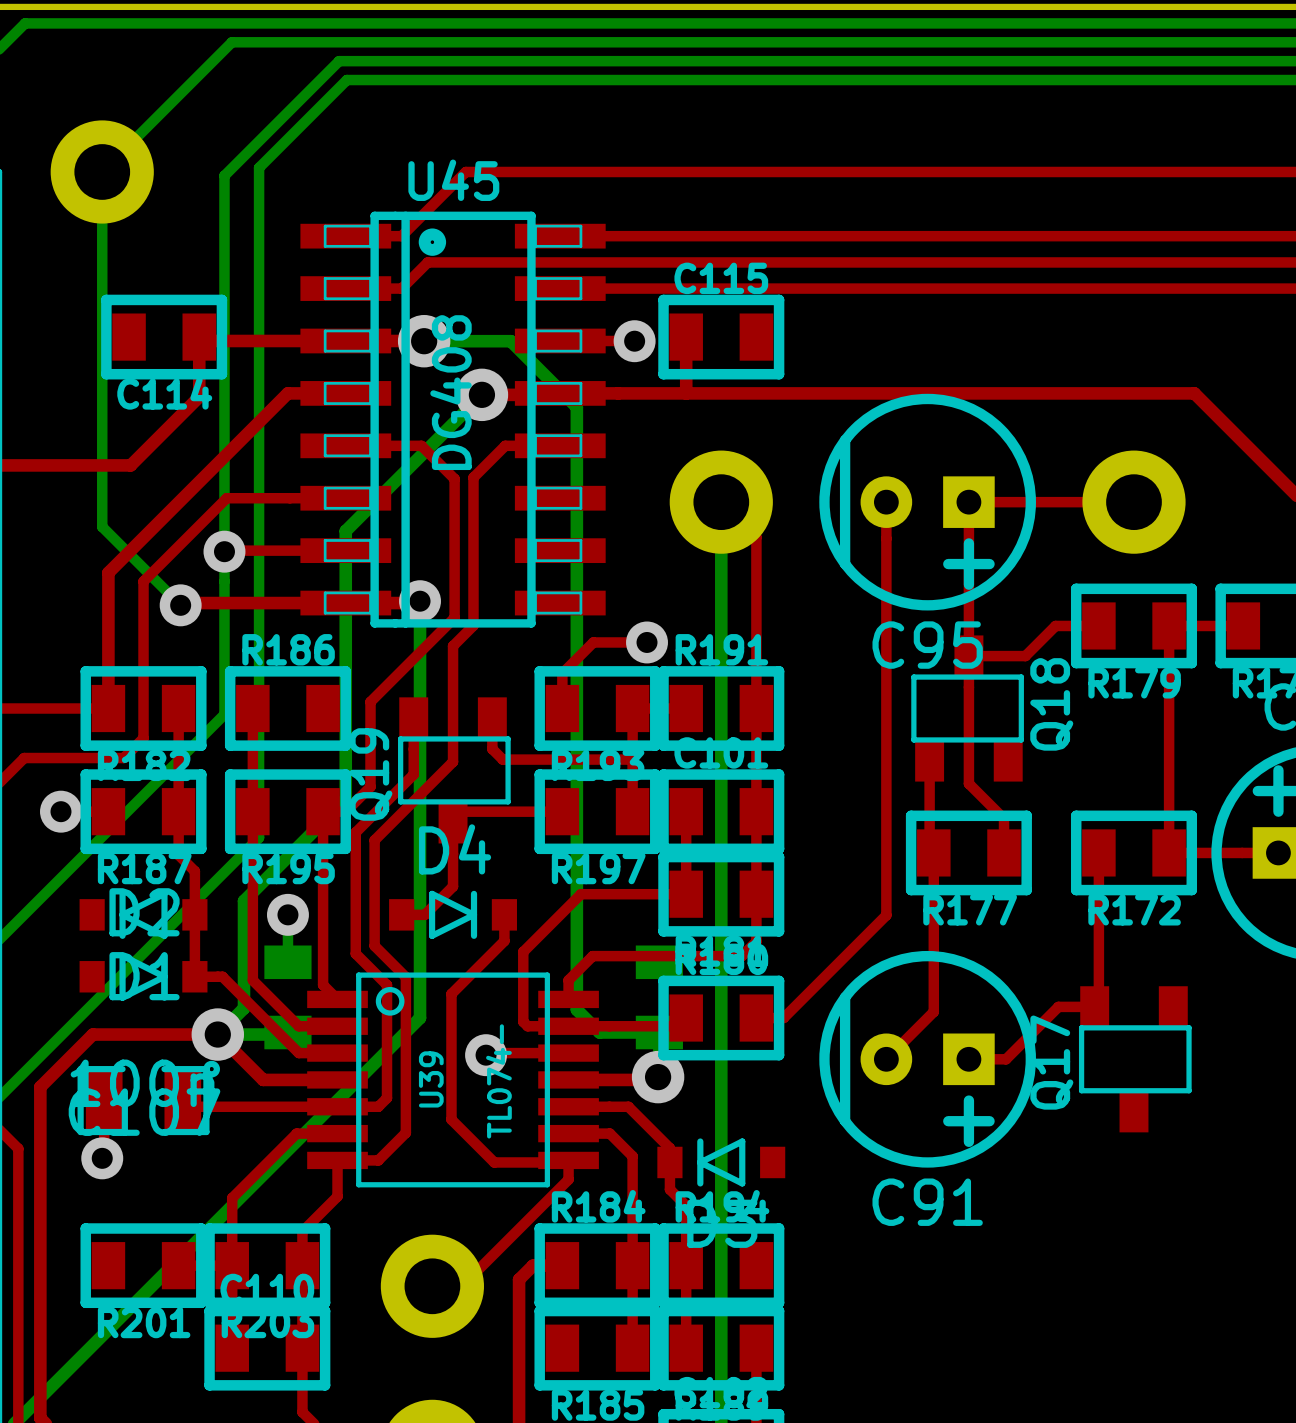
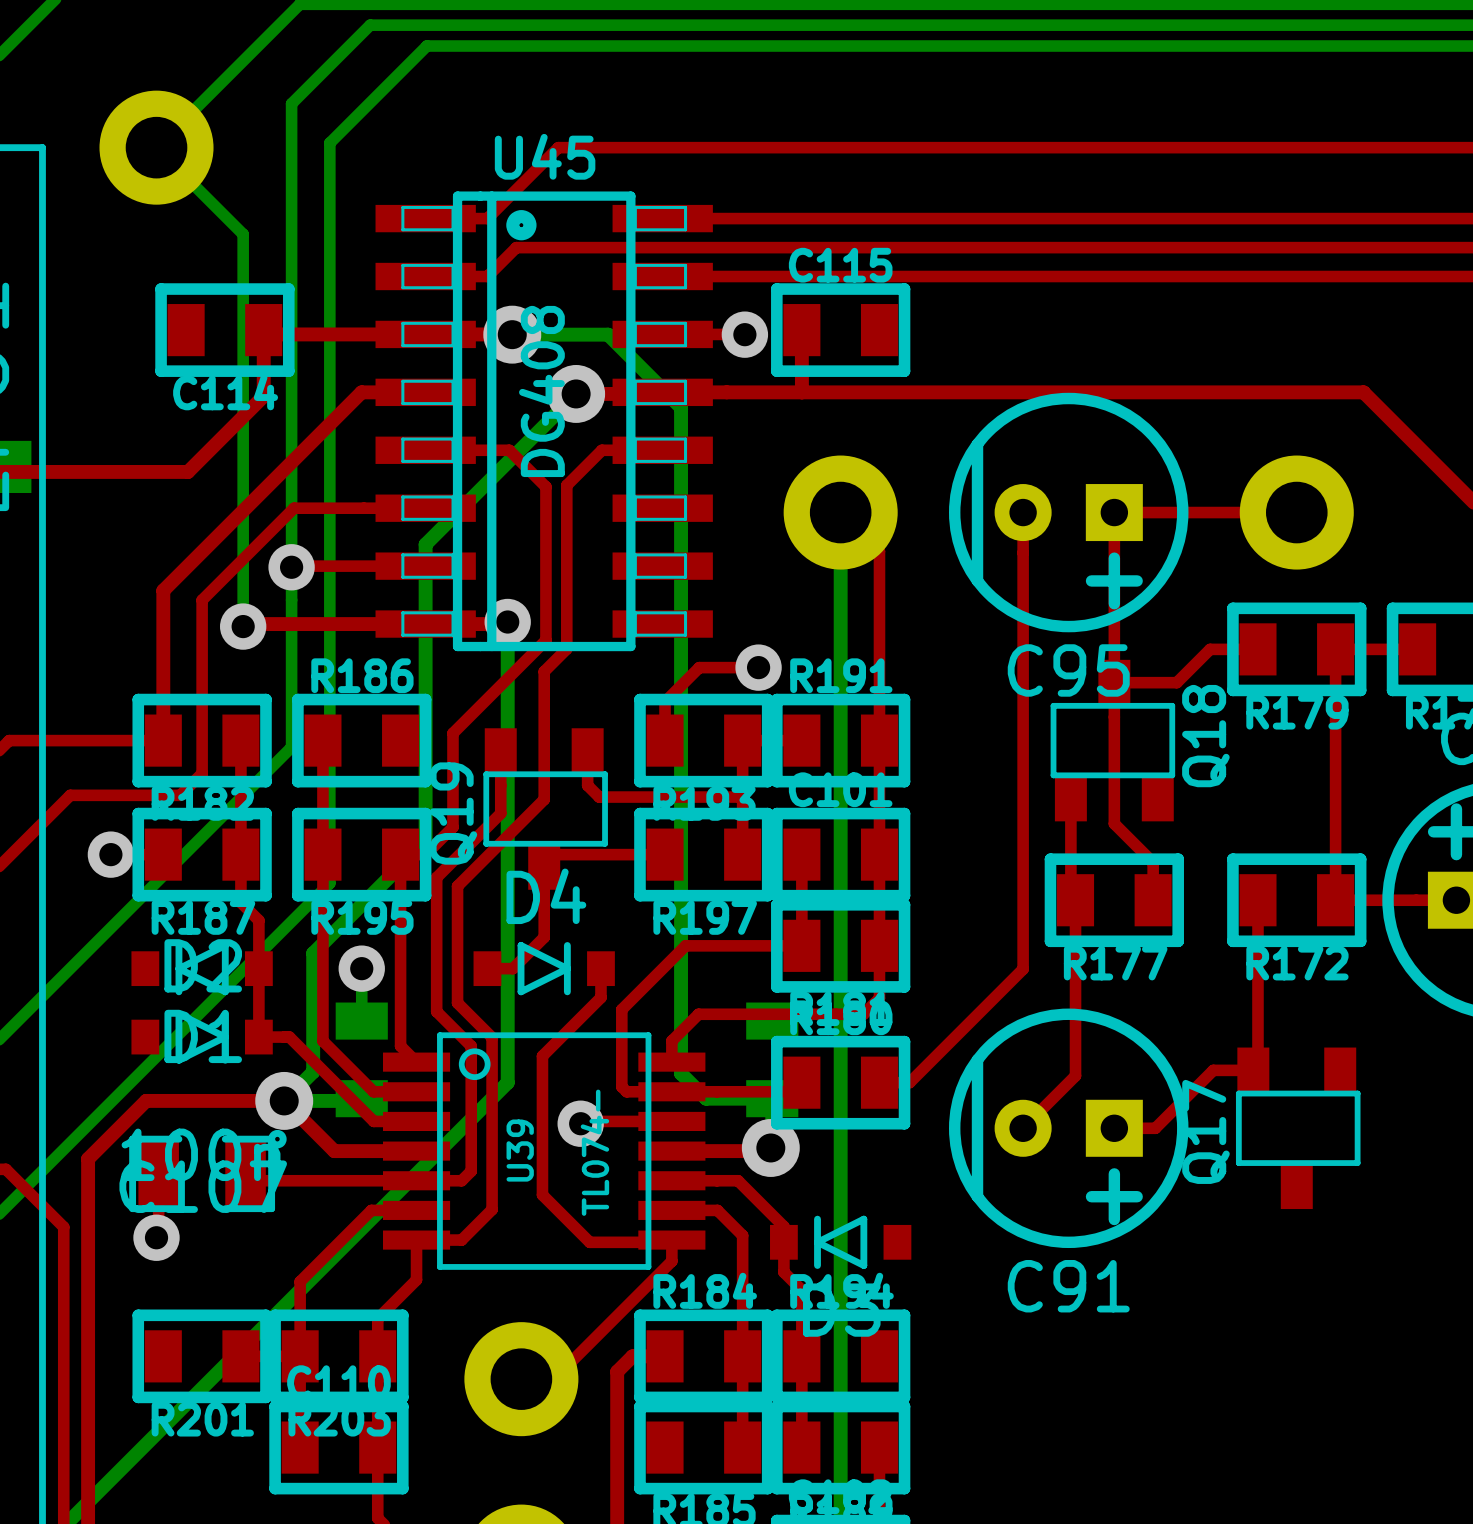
bottom track: (339, 61) (224, 175) -> (418, 25) (370, 25) (291, 103) (291, 151)
bottom track: (102, 171) (102, 526) (180, 605) -> (156, 147) (243, 234) (243, 626)

